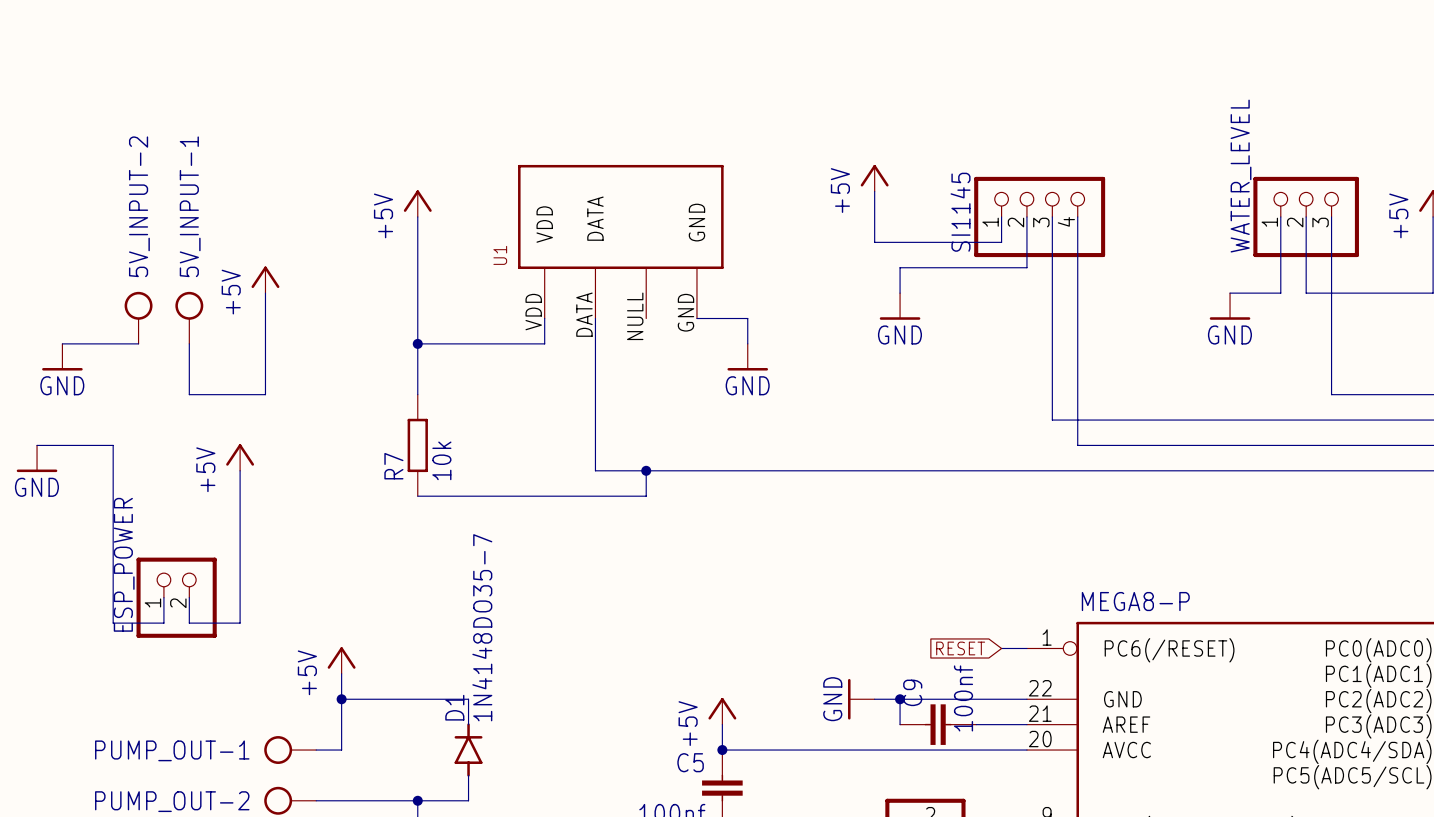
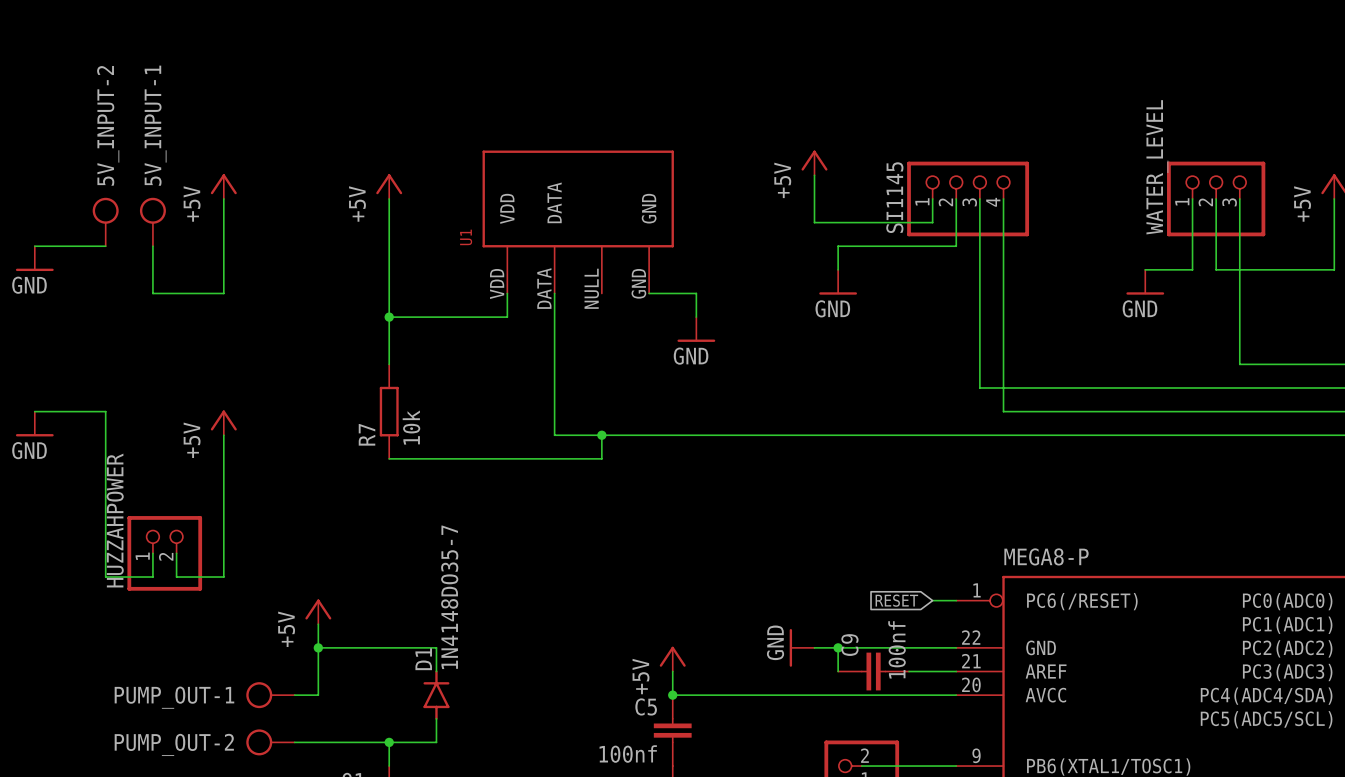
power symbol position: +5V (265, 279) -> +5V (223, 186)
wire: (265, 293) (265, 394) (189, 394) (189, 343) -> (223, 198) (223, 293) (152, 293) (152, 246)
5V_INPUT-2 position: (138, 317) -> (105, 222)
5V_INPUT-1 position: (189, 317) -> (152, 222)
wire: (62, 343) (138, 343) -> (34, 246) (105, 246)
power symbol position: GND (62, 357) -> GND (34, 258)
ESP_POWER name: ESP_POWER (124, 564) -> HUZZAHPOWER (115, 520)

